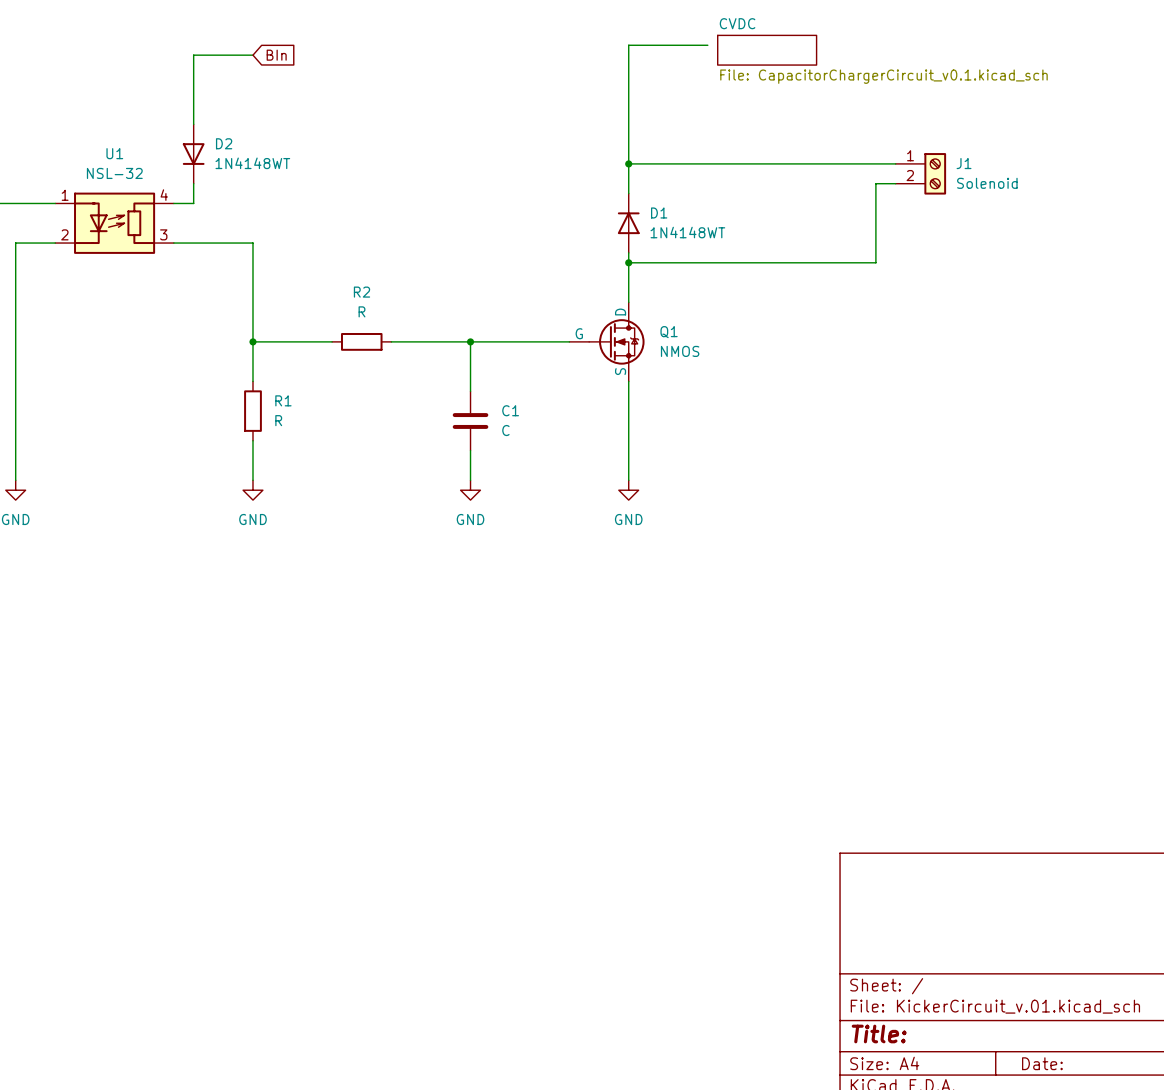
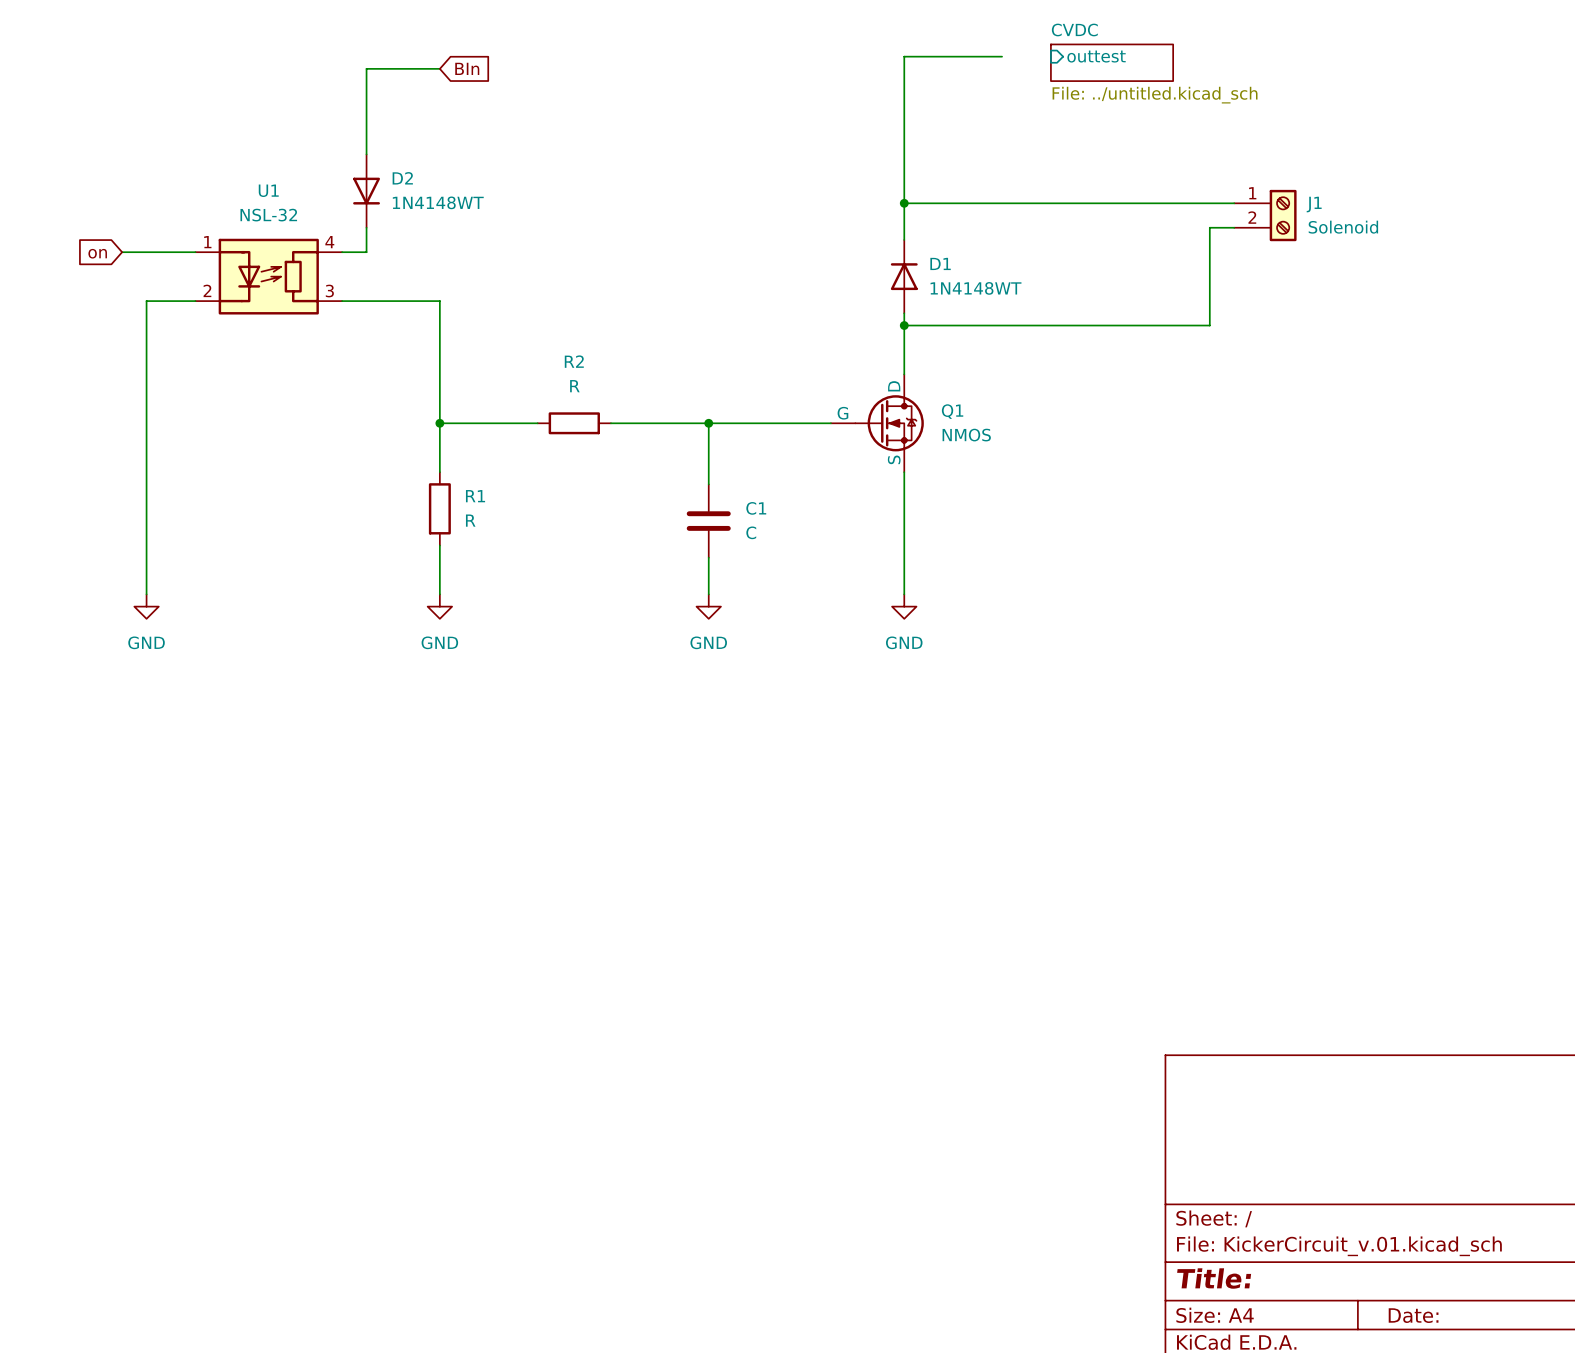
sheet pin: none -> outtest (1096, 56)
sheet CVDC: File: CapacitorChargerCircuit_v0.1.kicad_sch (767, 50) -> none
sheet CVDC: none -> File: ../untitled.kicad_sch (1112, 62)

